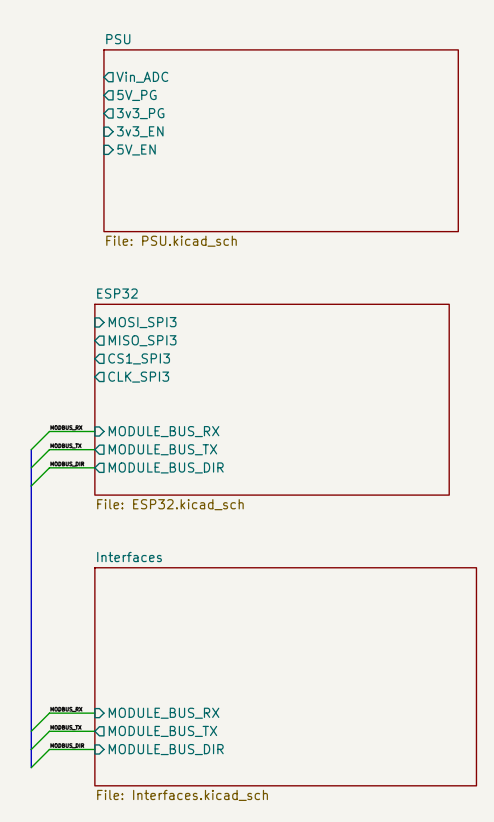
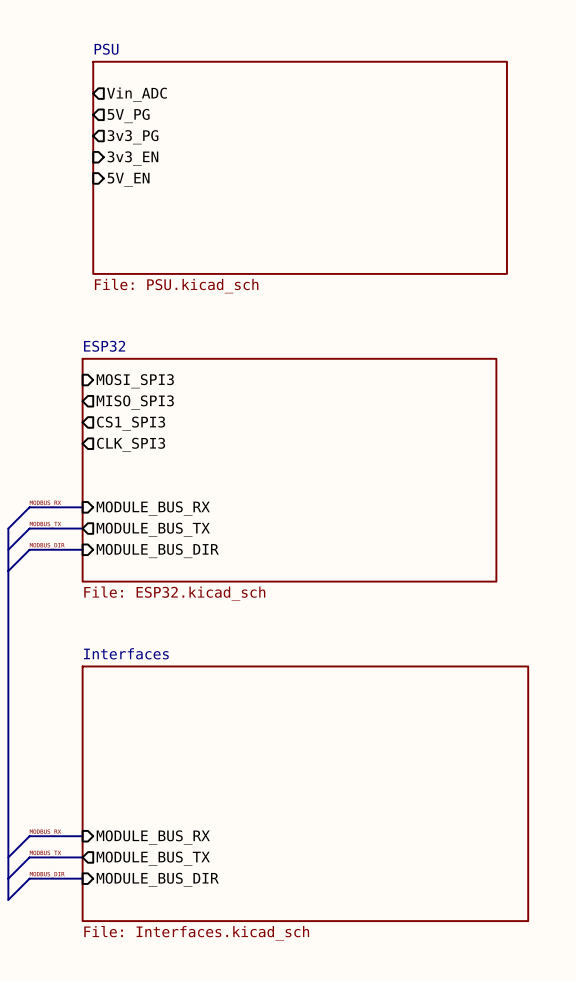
sheet pin shape: output (166, 467) -> input (157, 550)

